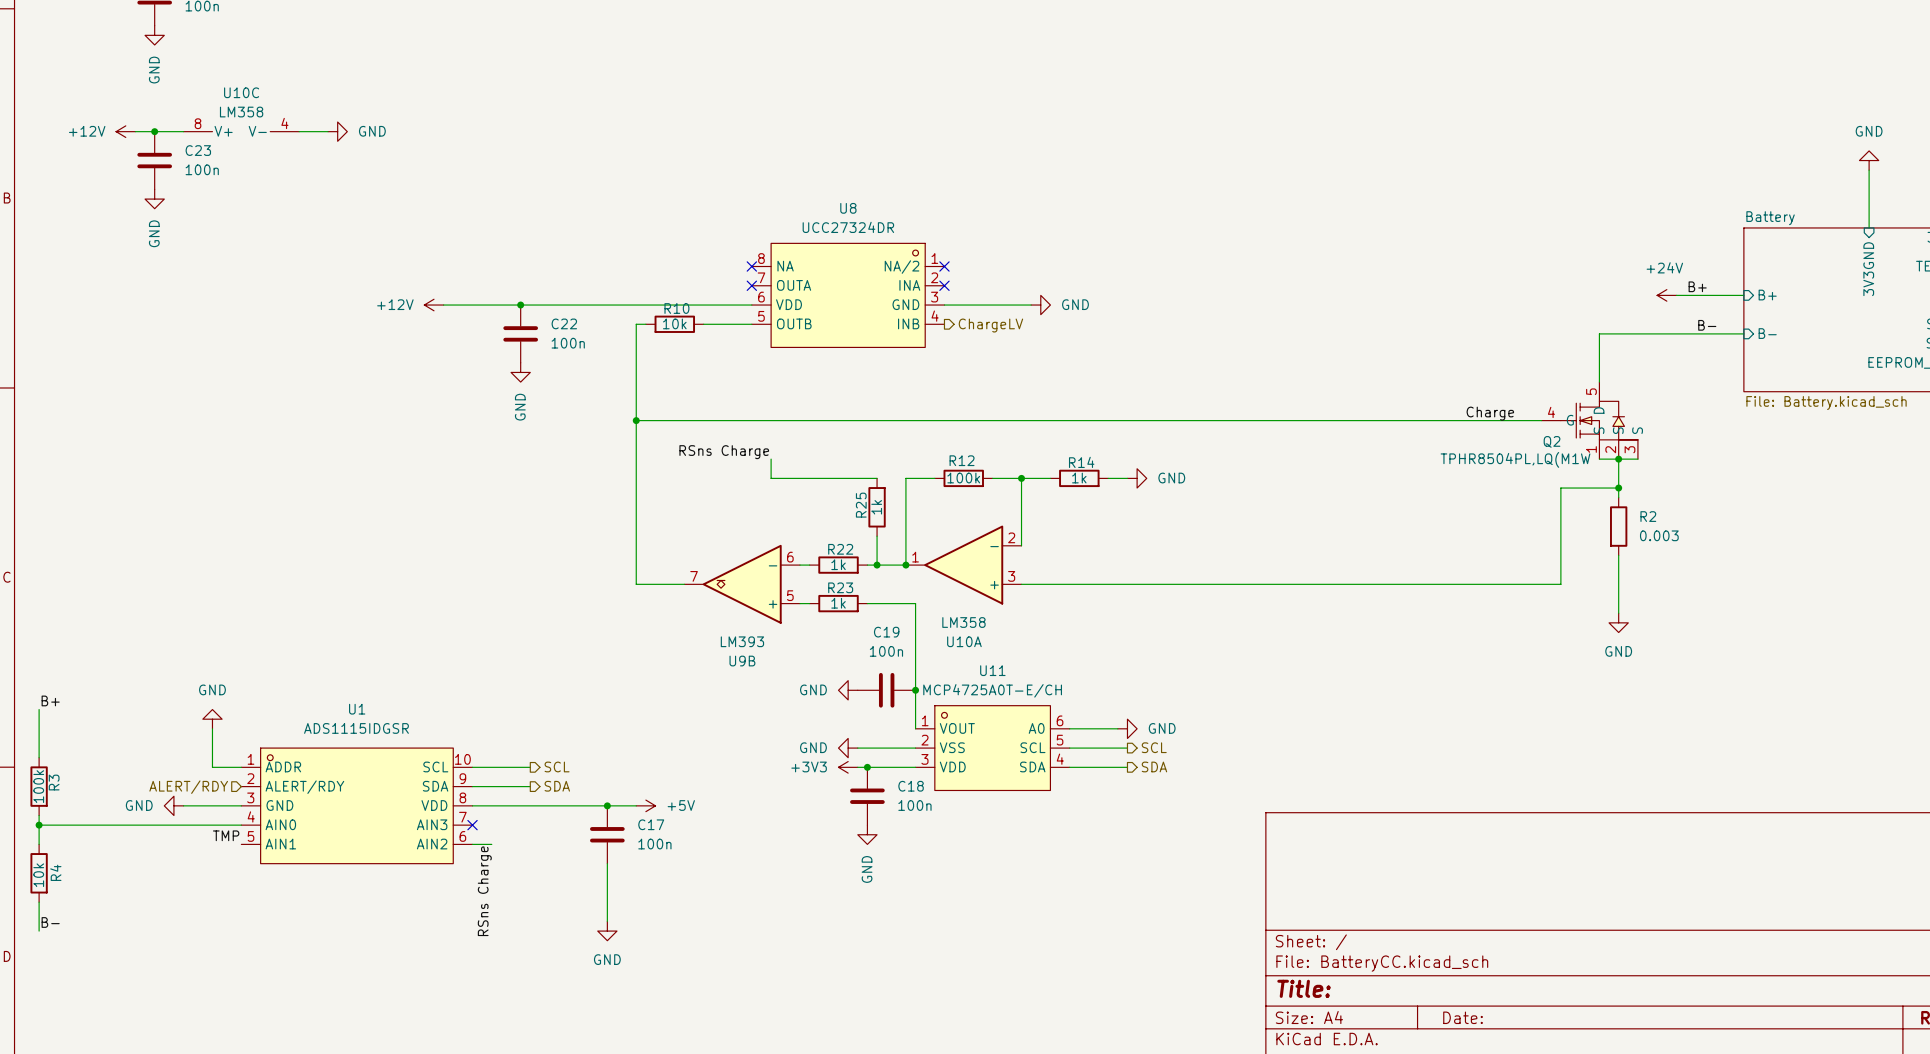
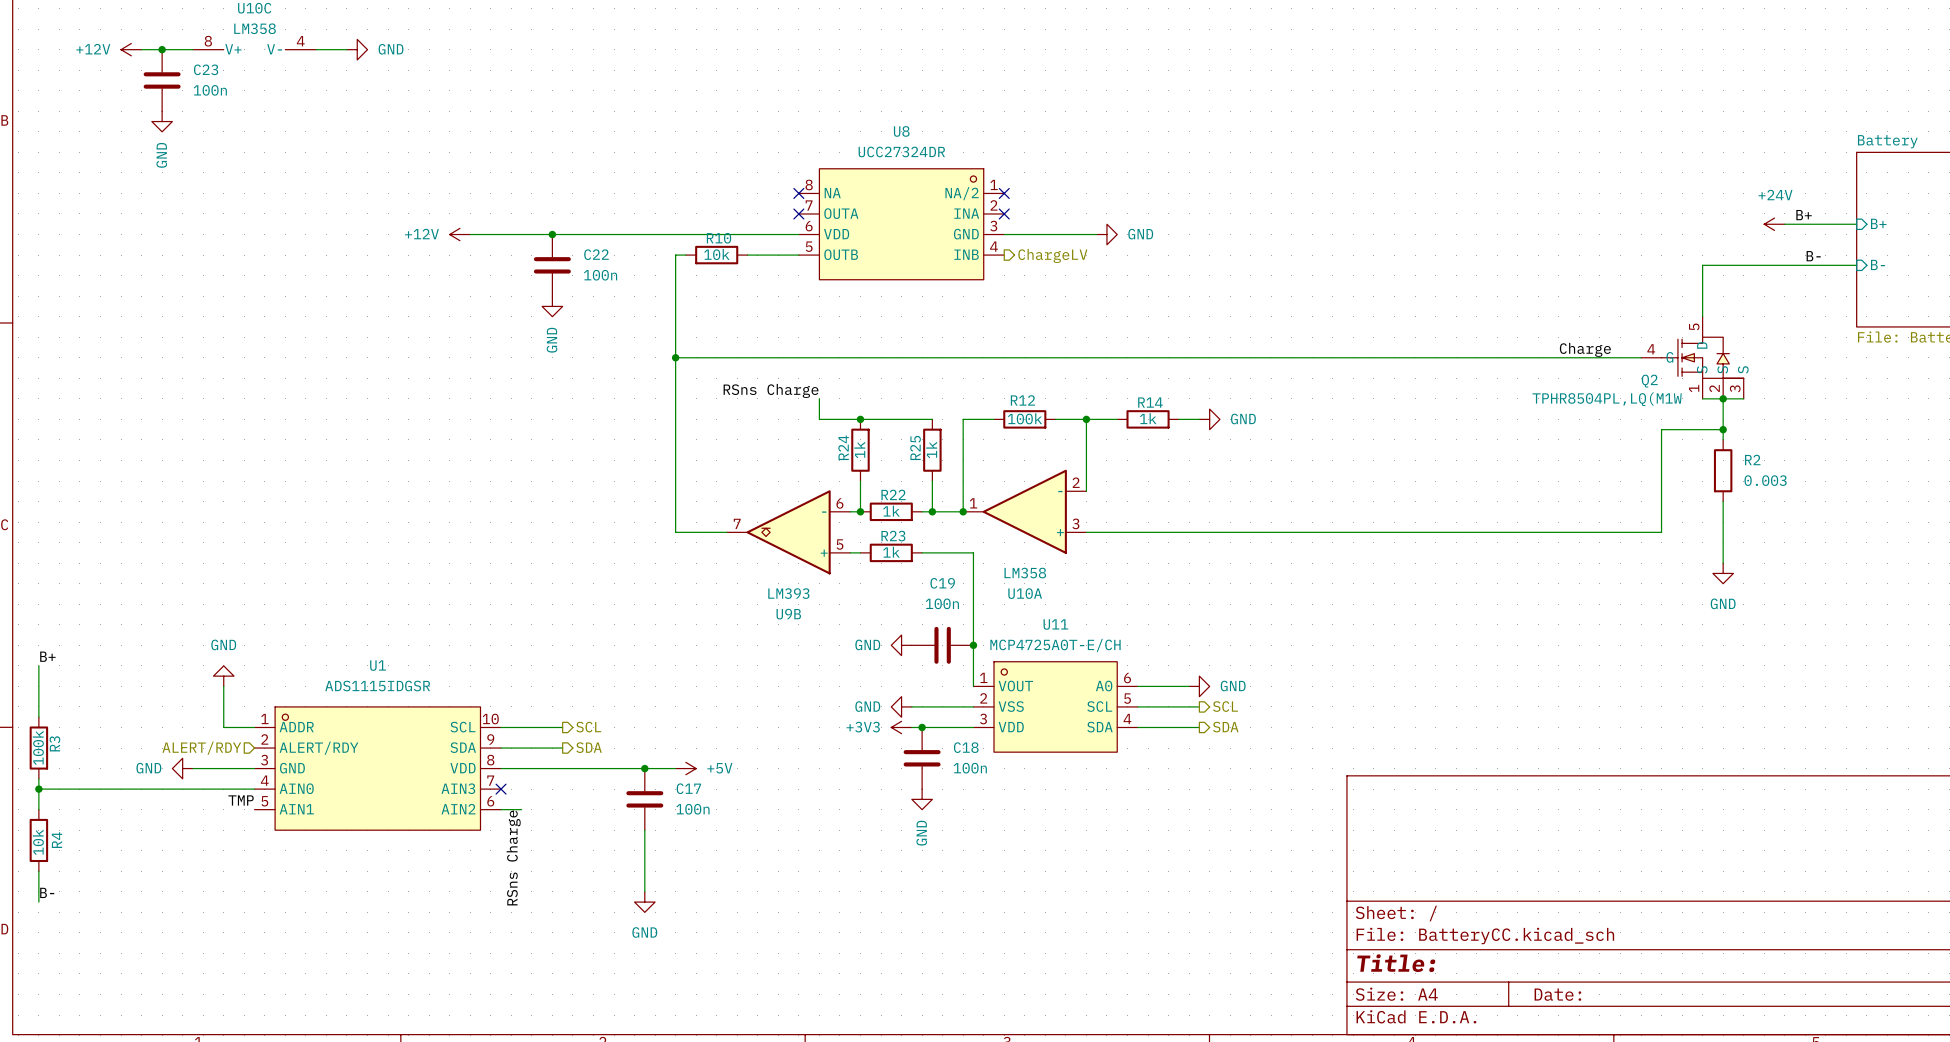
junction: none -> (860, 419)
R24: none -> 1k (860, 450)
wire: none -> (860, 481) (860, 511)
junction: none -> (860, 511)

